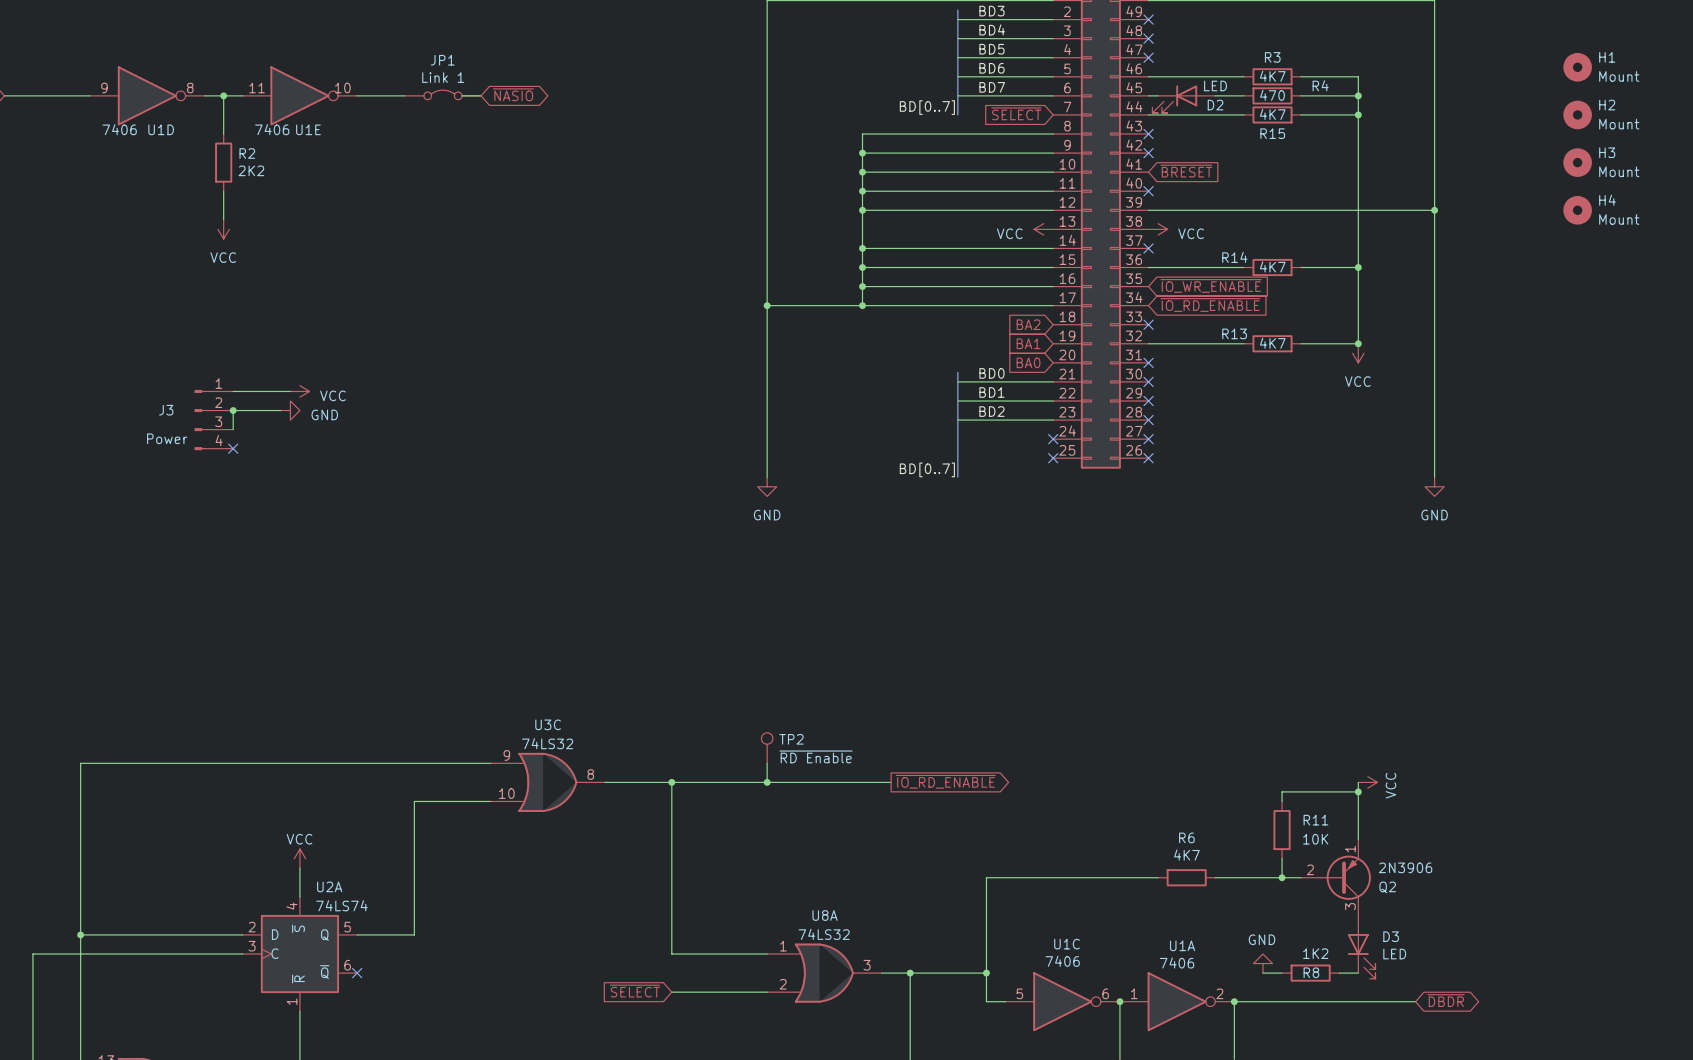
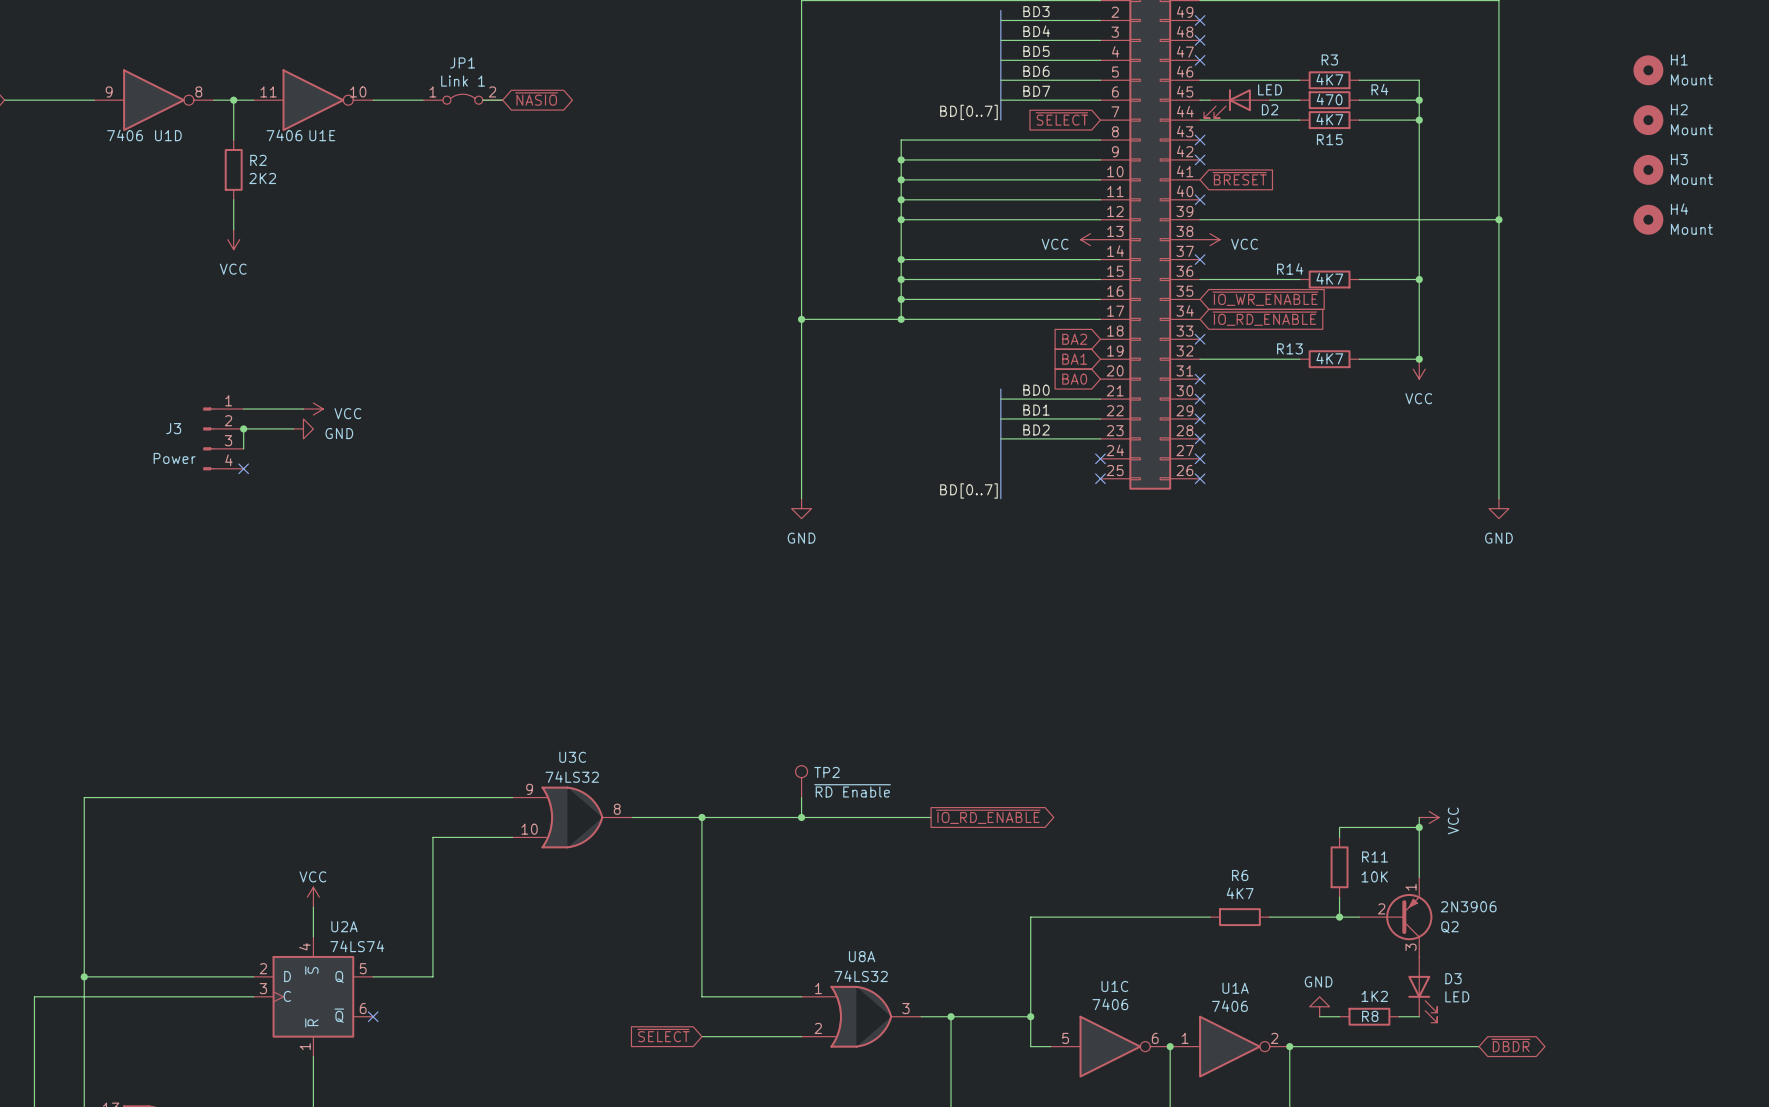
JP1 pin number: none -> 1 (432, 91)
JP1 pin number: none -> 2 (492, 91)
Q2 symbol: [1301, 839, 1371, 916] -> [1359, 877, 1433, 957]

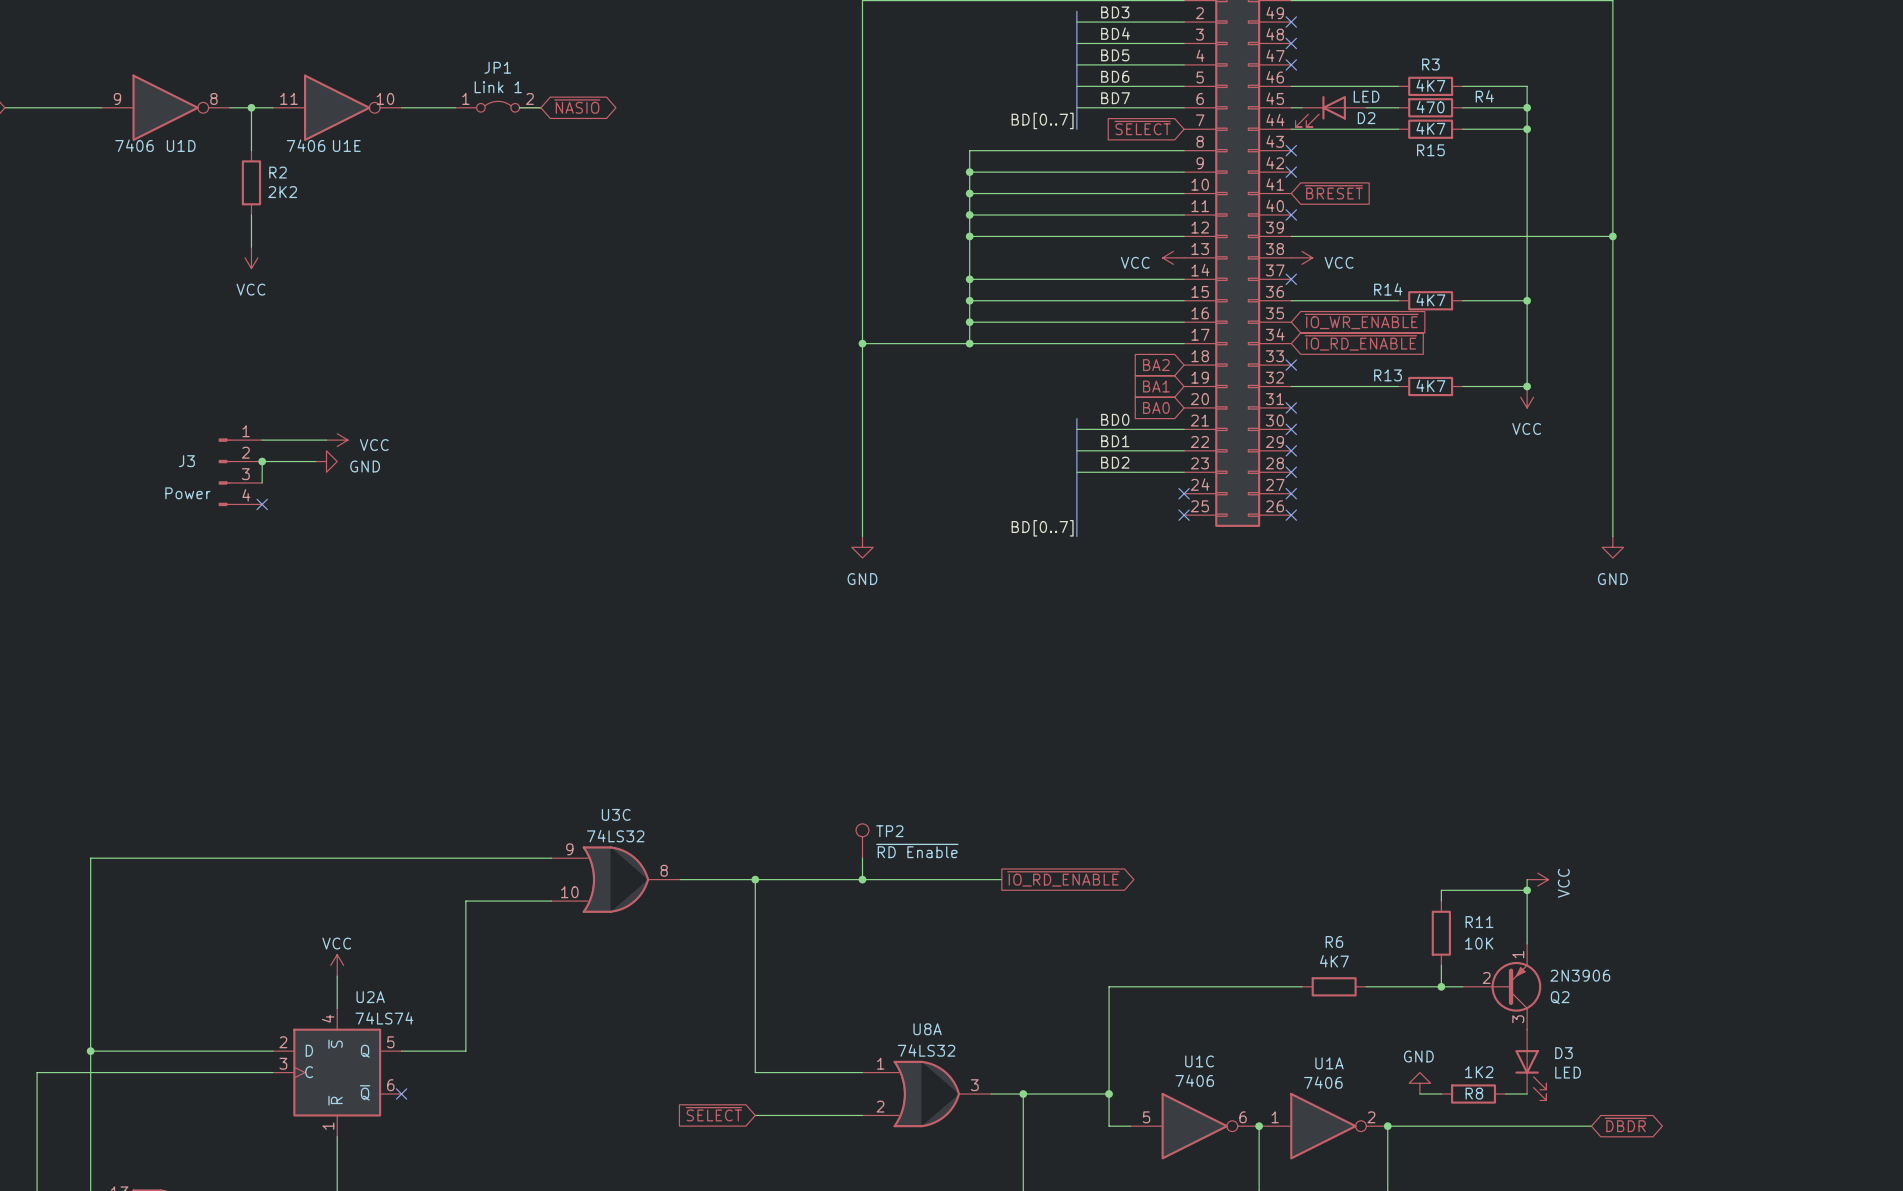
H1: Mount (1648, 70) -> none
H2: Mount (1648, 120) -> none
H3: Mount (1648, 169) -> none
H4: Mount (1648, 219) -> none

